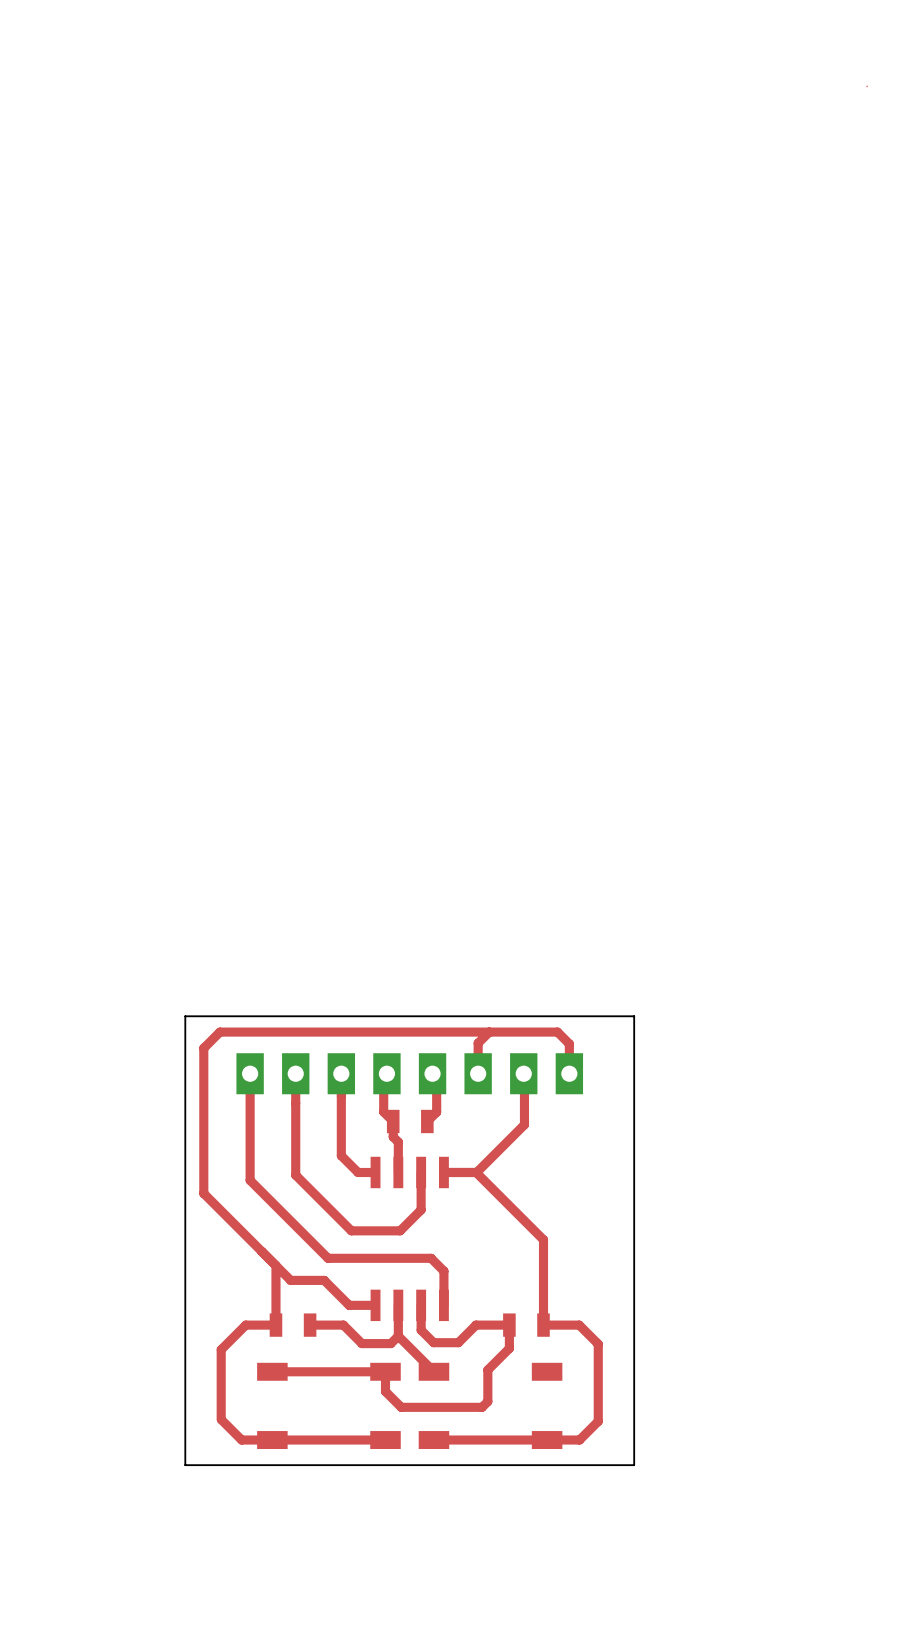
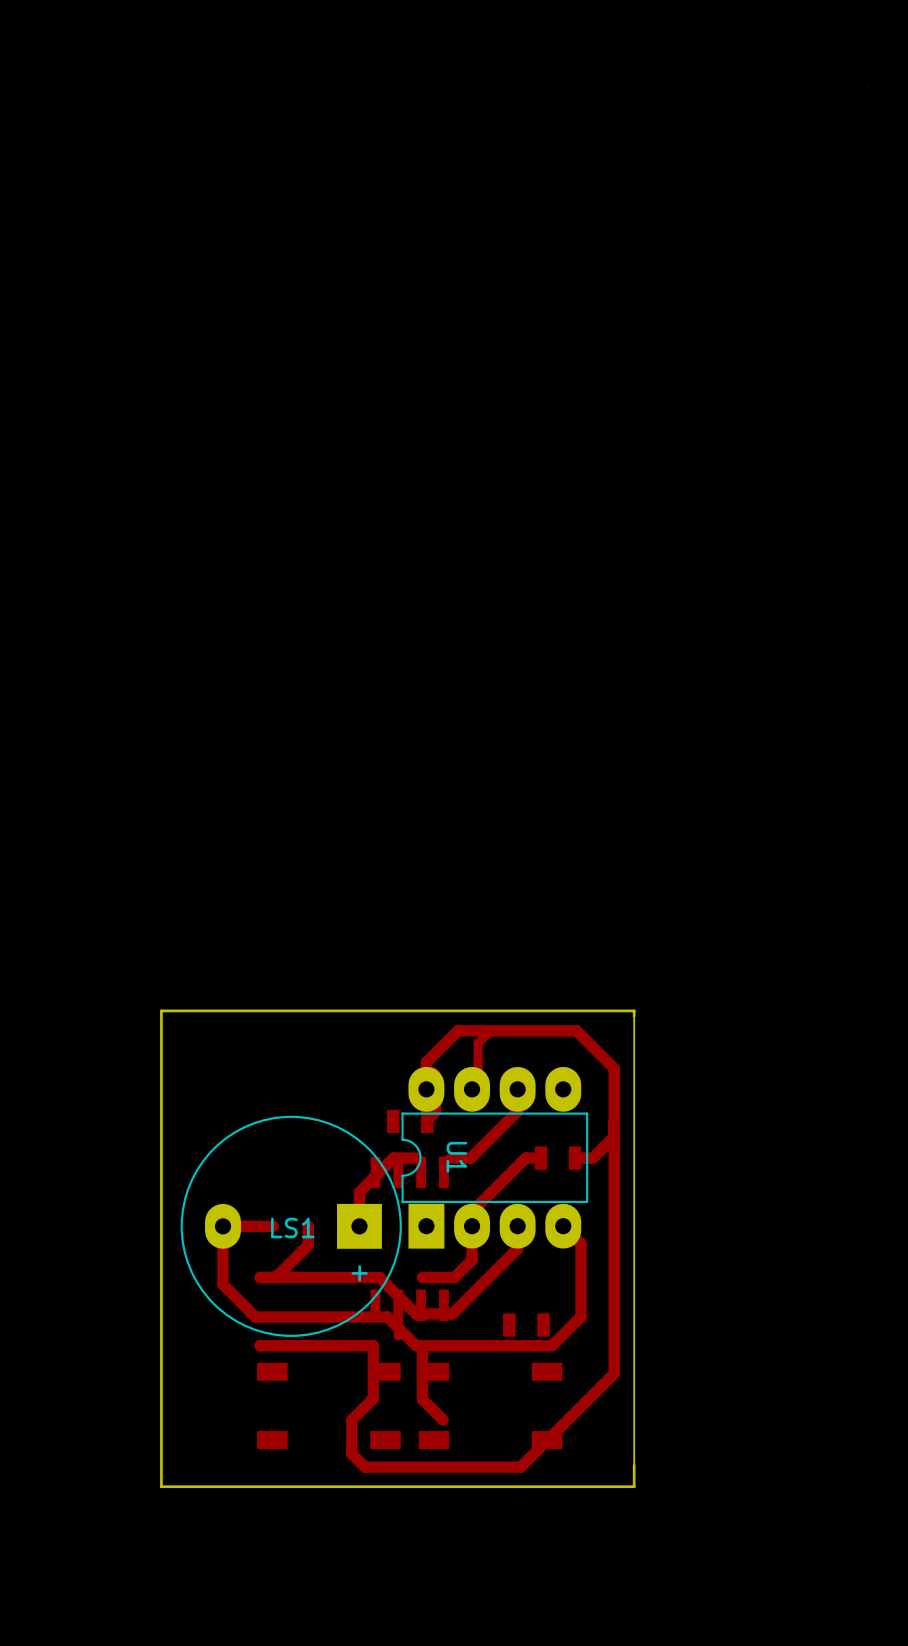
board edge: (634, 1016) (185, 1016) (185, 1465) (634, 1465) -> (634, 1016) (634, 1010) (161, 1010) (161, 1486) (634, 1486) (634, 1465)
top track: (250, 1073) (250, 1180) (328, 1258) (431, 1258) (443, 1271) (443, 1305) -> none
top track: (295, 1073) (295, 1175) (351, 1230) (400, 1230) (421, 1209) (421, 1172) -> none
top track: (341, 1073) (341, 1155) (358, 1172) (375, 1172) -> none
top track: (386, 1073) (383, 1076) (383, 1111) (393, 1121) (393, 1136) (398, 1142) (398, 1172) -> none
part: (409, 1073) -> none
top track: (569, 1073) (569, 1043) (557, 1032) (219, 1032) (203, 1048) (203, 1193) (290, 1280) (324, 1280) (349, 1305) (375, 1305) -> none
top track: (521, 1083) (524, 1086) (524, 1124) (476, 1172) (443, 1172) -> none
top track: none -> (517, 1084) (517, 1111) (470, 1158) (451, 1158)
top track: none -> (426, 1089) (426, 1062) (458, 1030) (576, 1030) (614, 1068) (614, 1373) (520, 1467) (365, 1467) (351, 1453) (351, 1420) (373, 1398) (373, 1345) (260, 1345)
top track: none -> (614, 1136) (592, 1158) (575, 1158)
U1: none -> (494, 1157)
top track: none -> (416, 1158) (393, 1158) (359, 1192) (359, 1224)
top track: none -> (540, 1158) (525, 1158) (472, 1211) (472, 1260) (454, 1277) (422, 1277)
top track: (476, 1172) (543, 1239) (543, 1325) (579, 1325) (598, 1344) (598, 1421) (579, 1440) (433, 1440) -> none
LS1: none -> (291, 1226)
top track: none -> (308, 1226) (308, 1245) (275, 1277)
top track: none -> (517, 1226) (517, 1248) (452, 1313) (415, 1313) (379, 1277) (260, 1277)
top track: none -> (563, 1226) (581, 1243) (581, 1316) (552, 1345) (416, 1345) (387, 1317) (255, 1317) (223, 1284) (223, 1226) (273, 1226)
top track: (275, 1265) (275, 1325) (245, 1325) (221, 1349) (221, 1419) -> none
top track: (421, 1305) (421, 1330) (433, 1342) (458, 1342) (476, 1325) (509, 1325) -> none
part position: (293, 1325) -> (558, 1158)
top track: (310, 1325) (343, 1325) (361, 1343) (390, 1343) (398, 1336) (433, 1371) -> none
top track: (509, 1325) (509, 1348) (487, 1369) (487, 1401) (482, 1407) (401, 1407) (385, 1391) (385, 1371) (272, 1371) -> none
top track: none -> (422, 1345) (422, 1399) (443, 1420)
top track: (221, 1419) (241, 1440) (385, 1440) -> none

